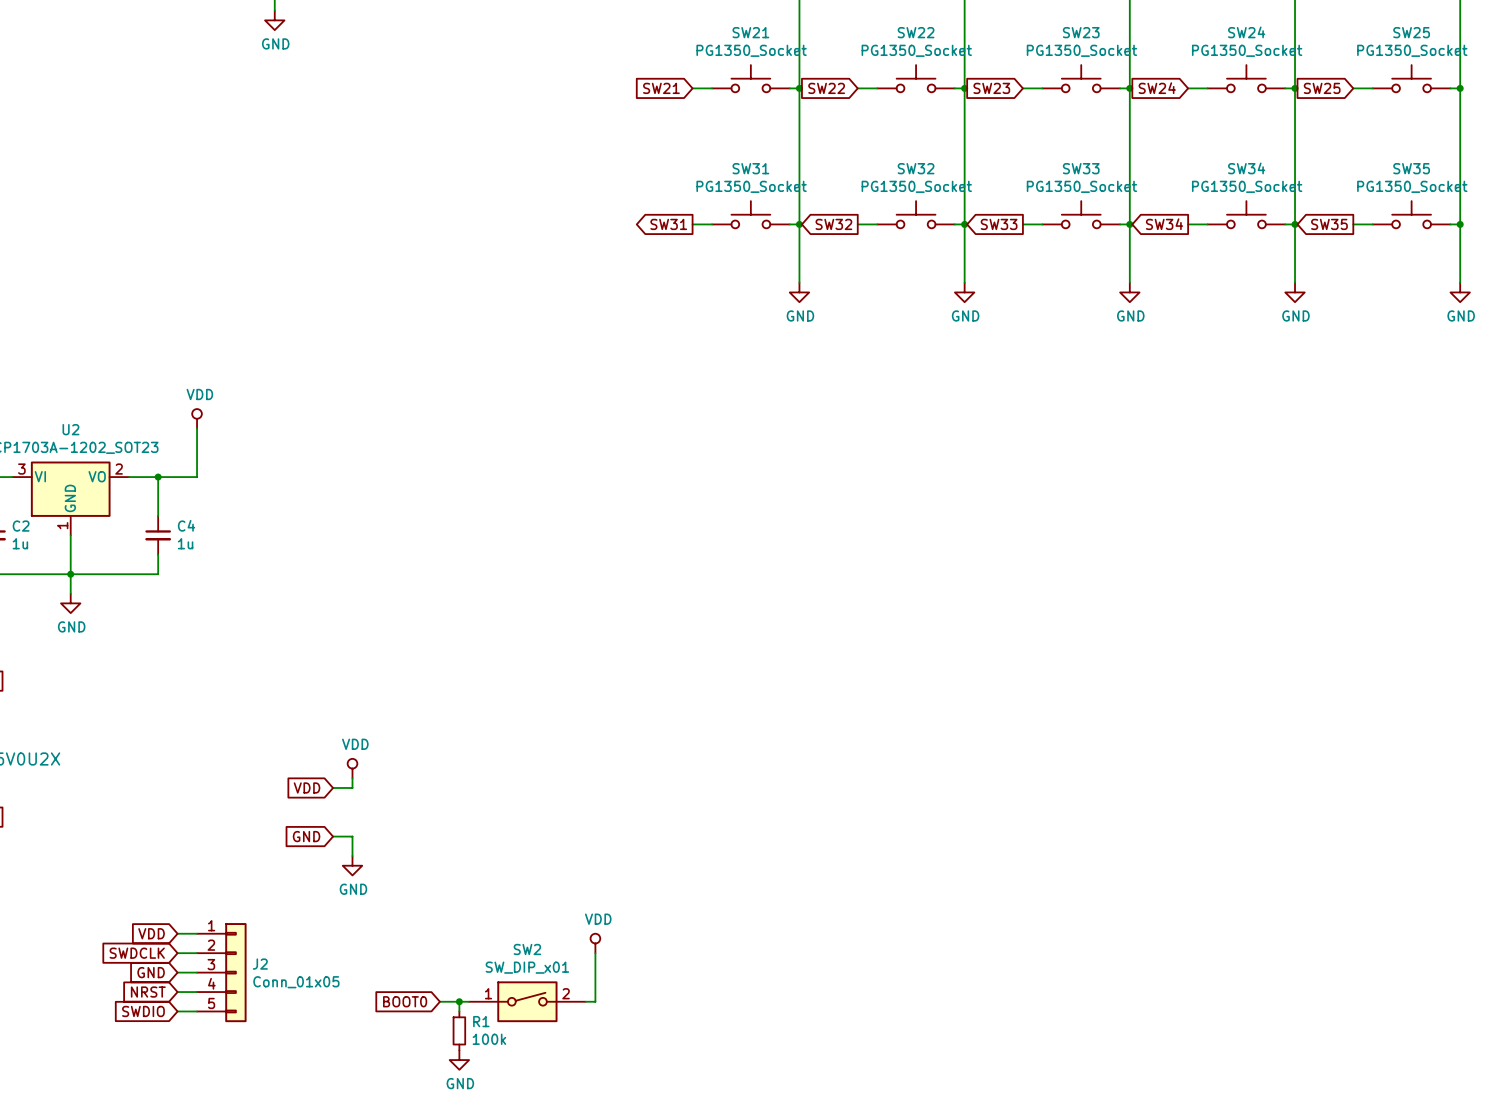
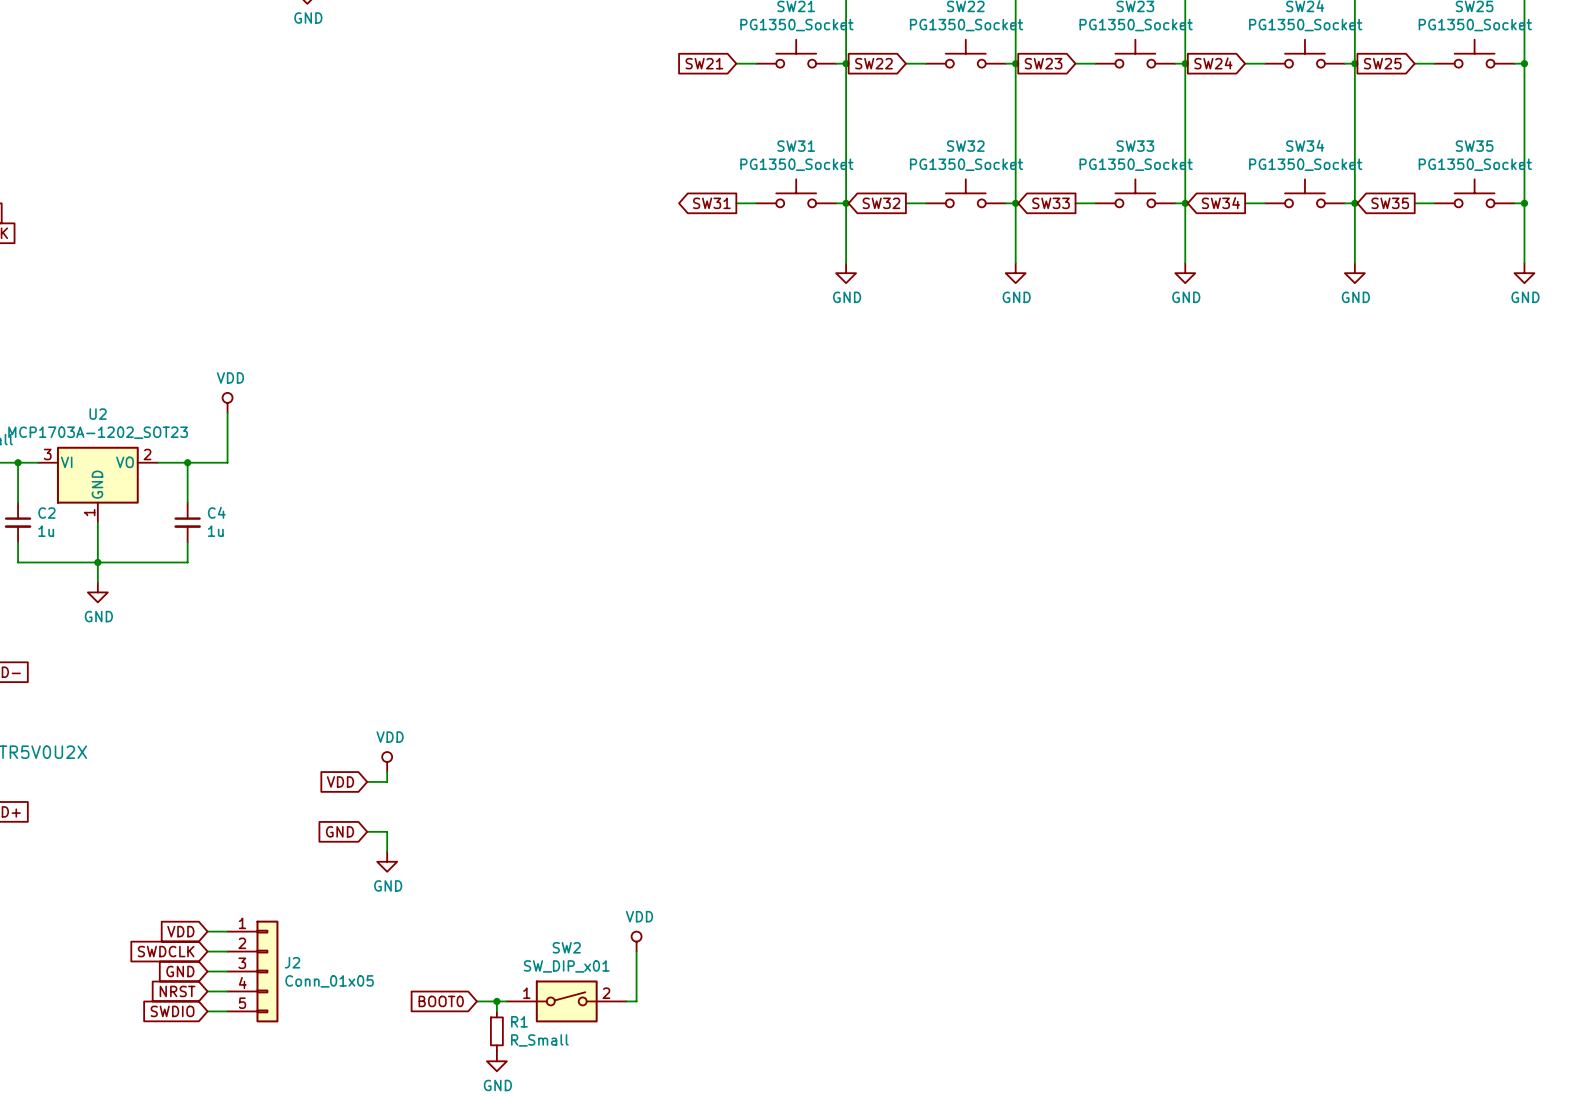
R1 value: 100k (489, 1039) -> R_Small (539, 1040)

